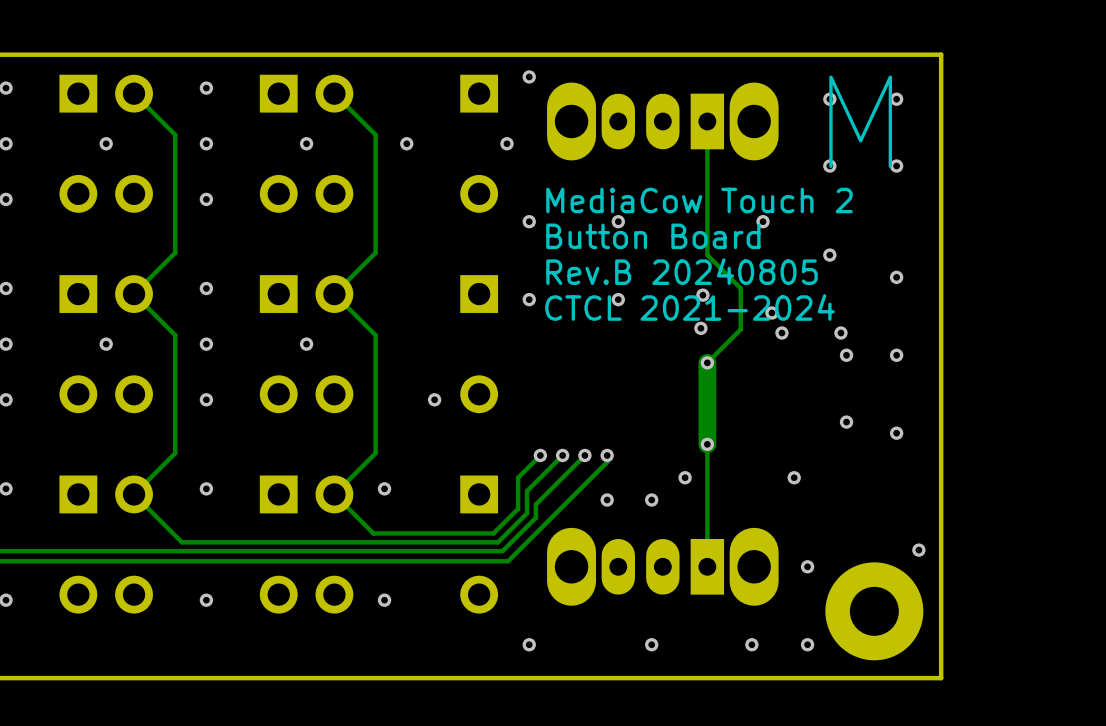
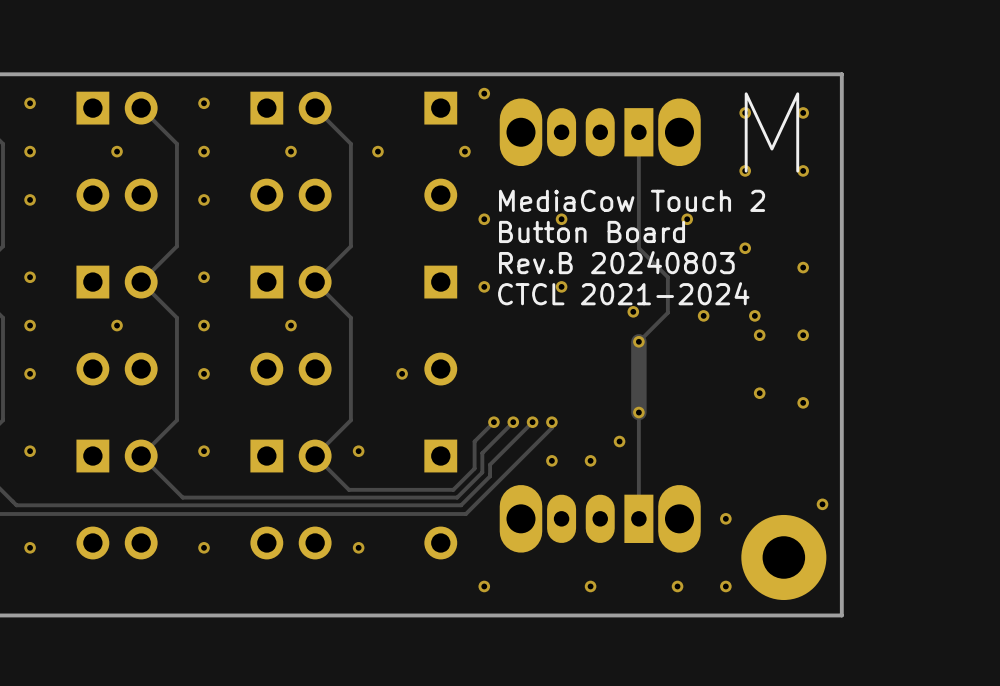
text: Rev.B 20240805 (682, 271) -> Rev.B 20240803 (616, 262)
via: (702, 295) -> none
via: (771, 312) -> none
via: (794, 477) -> none

